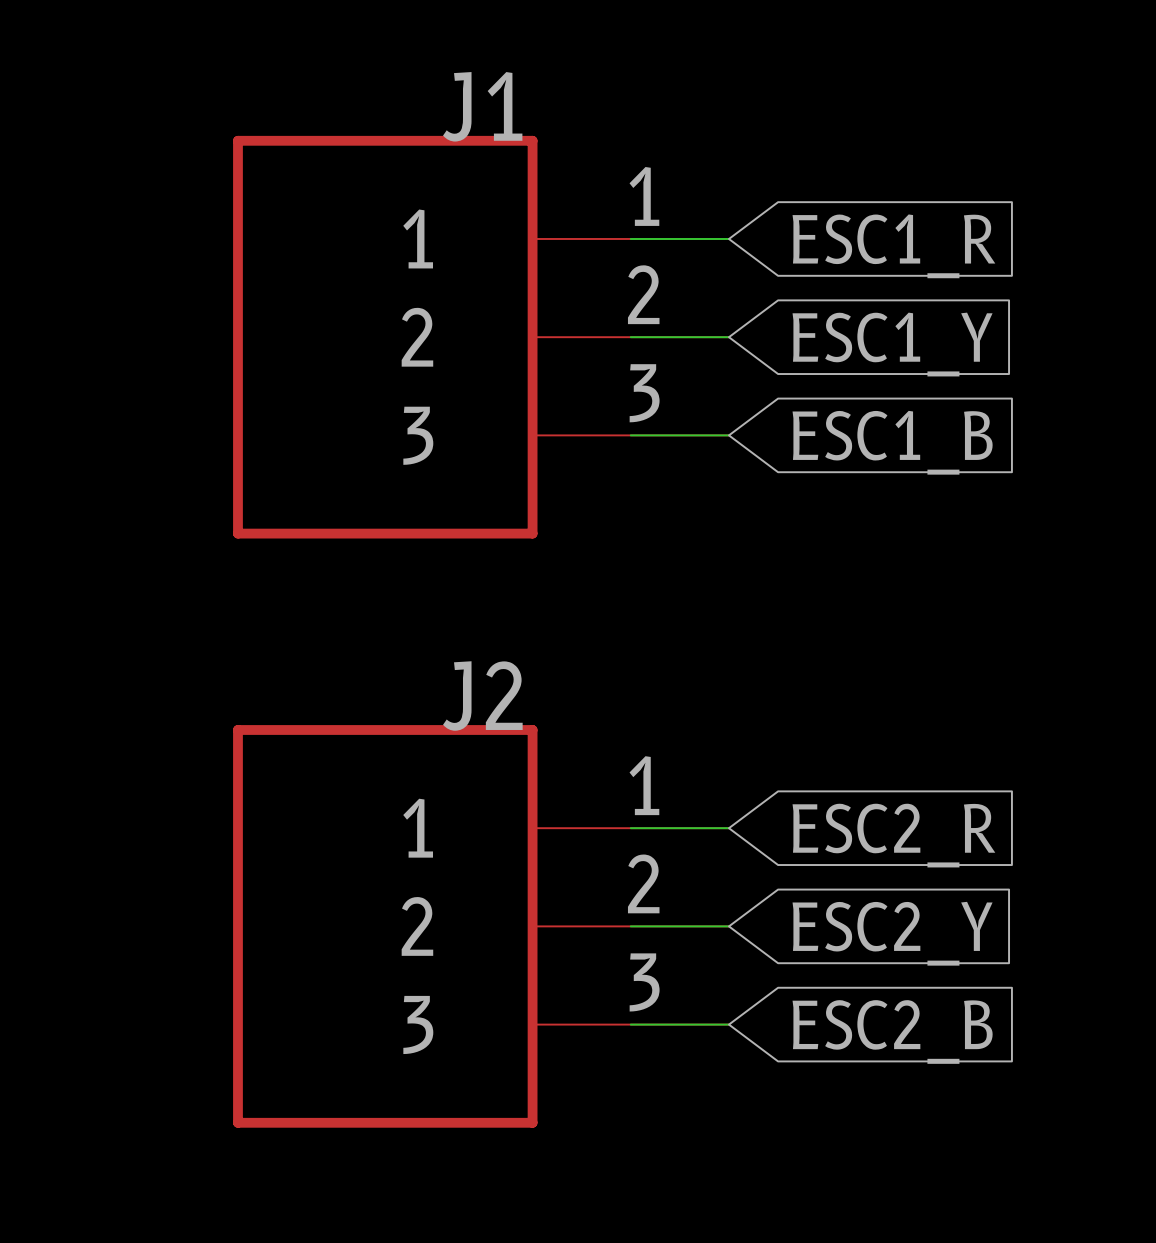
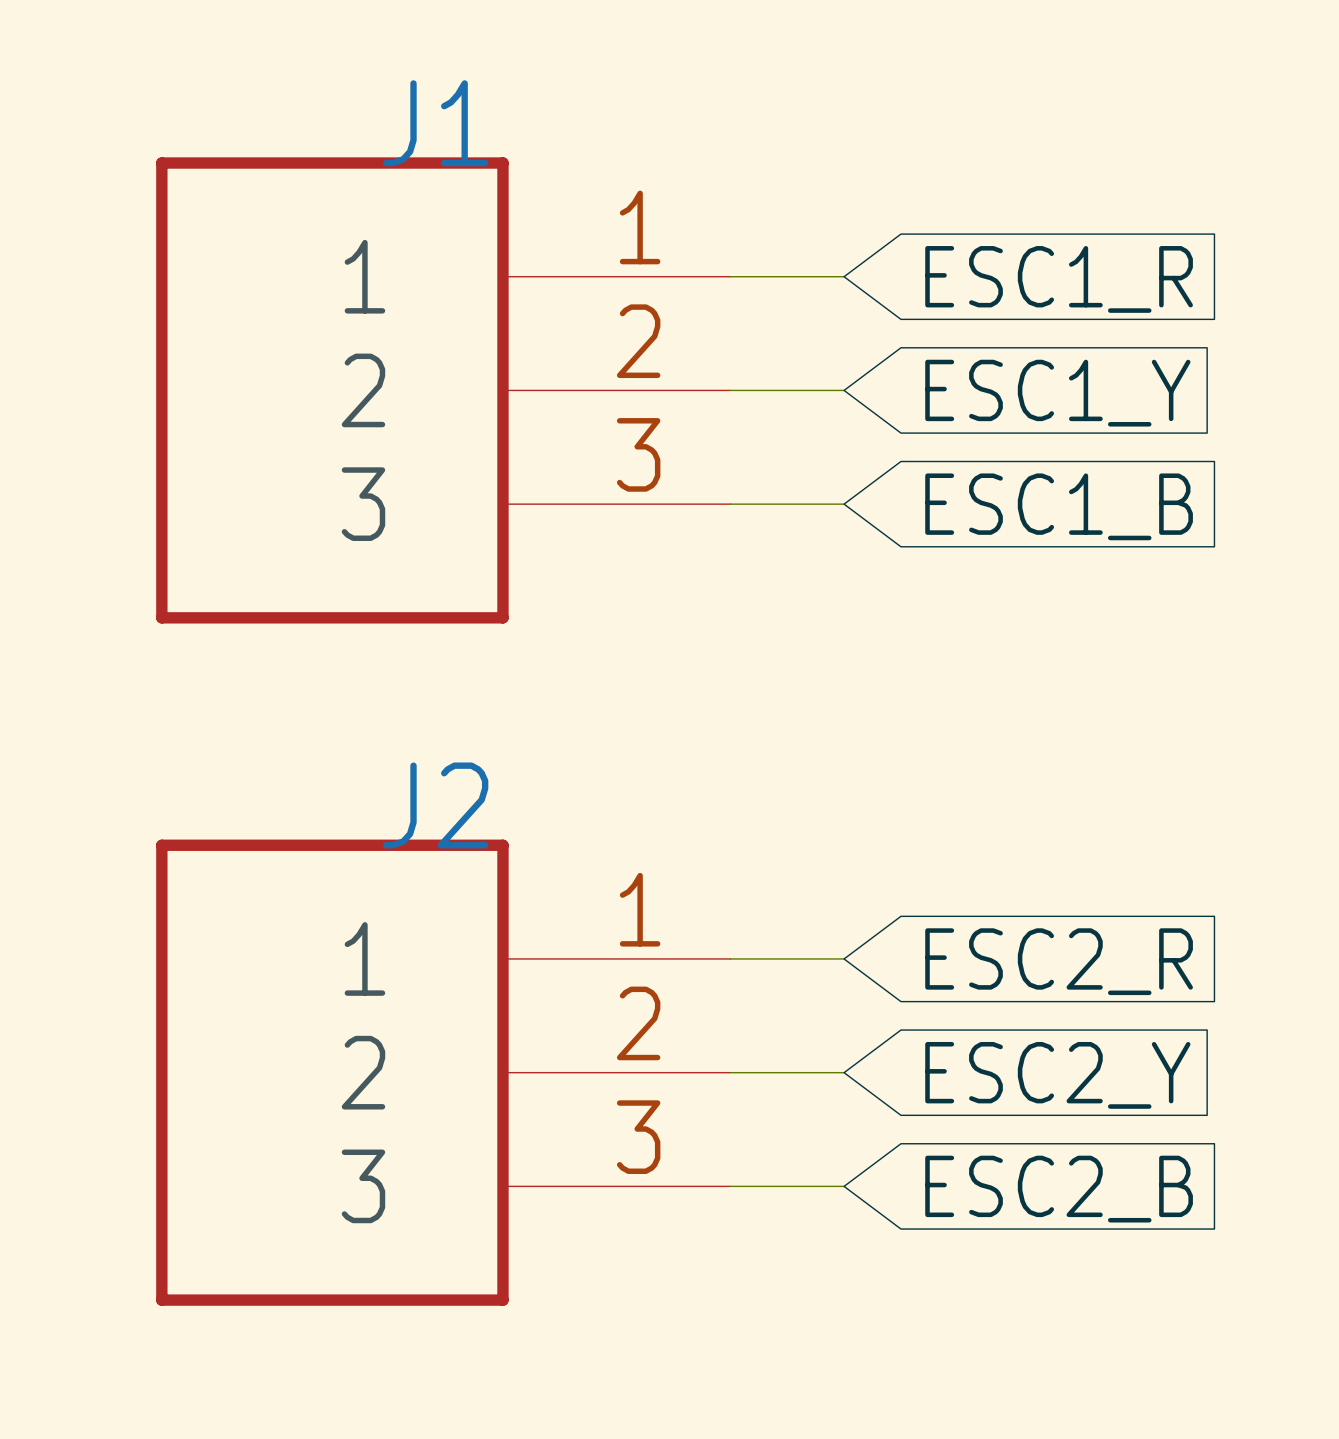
J1 position: (481, 337) -> (443, 390)
J2 position: (481, 926) -> (443, 1072)

